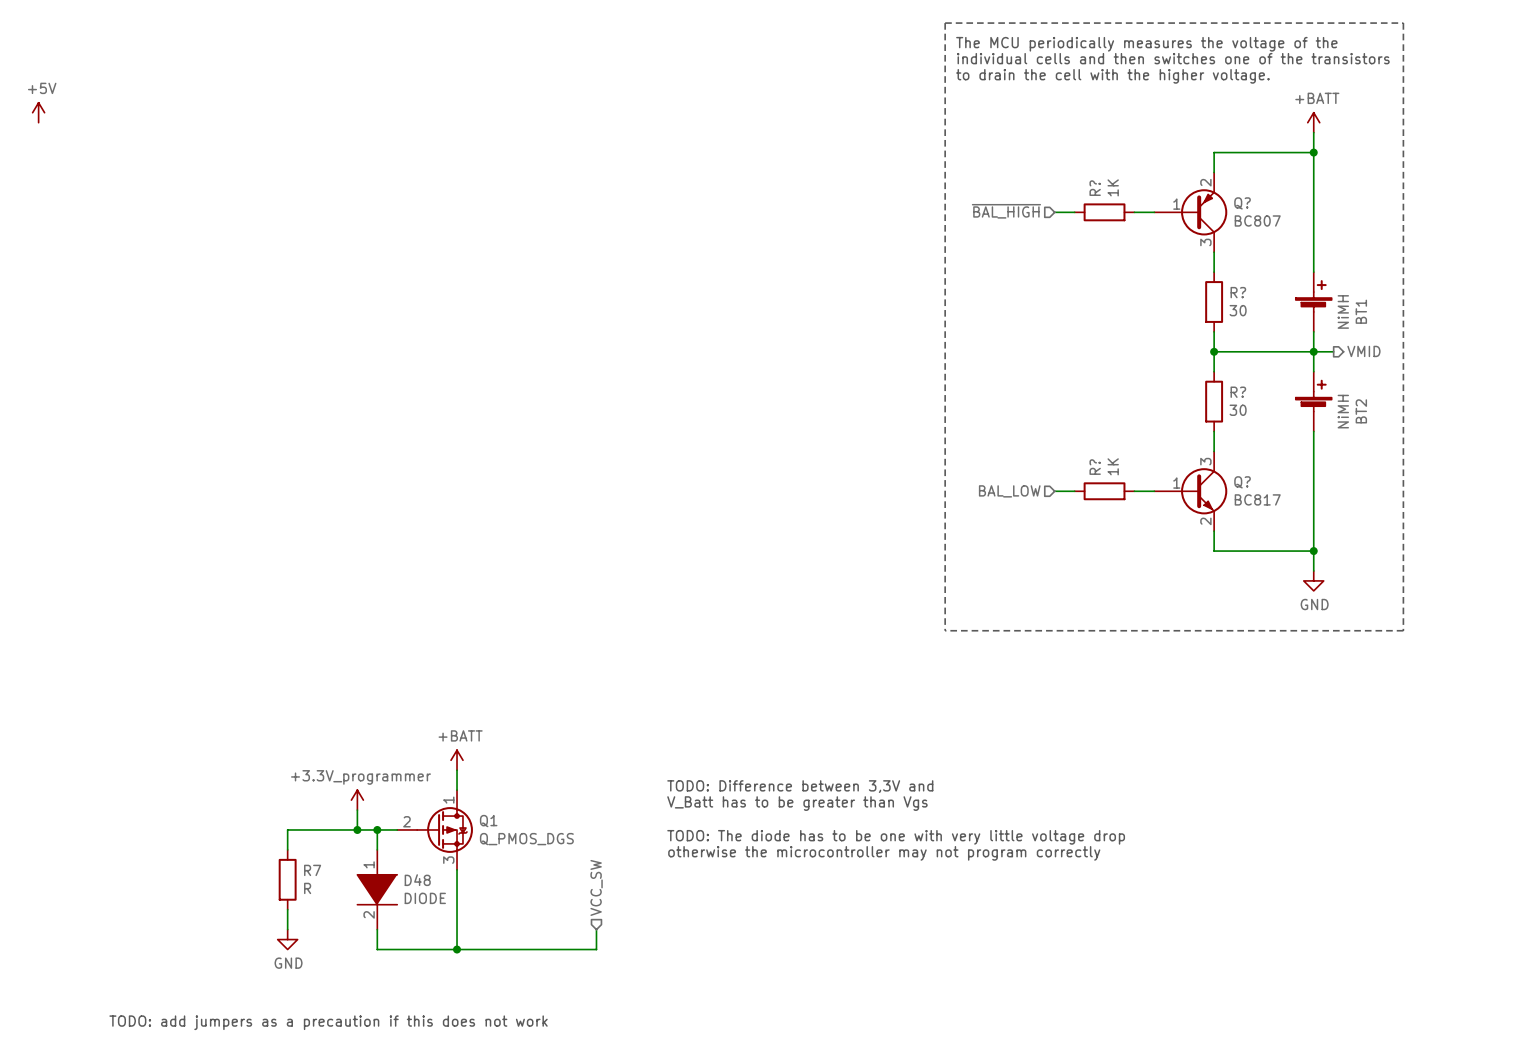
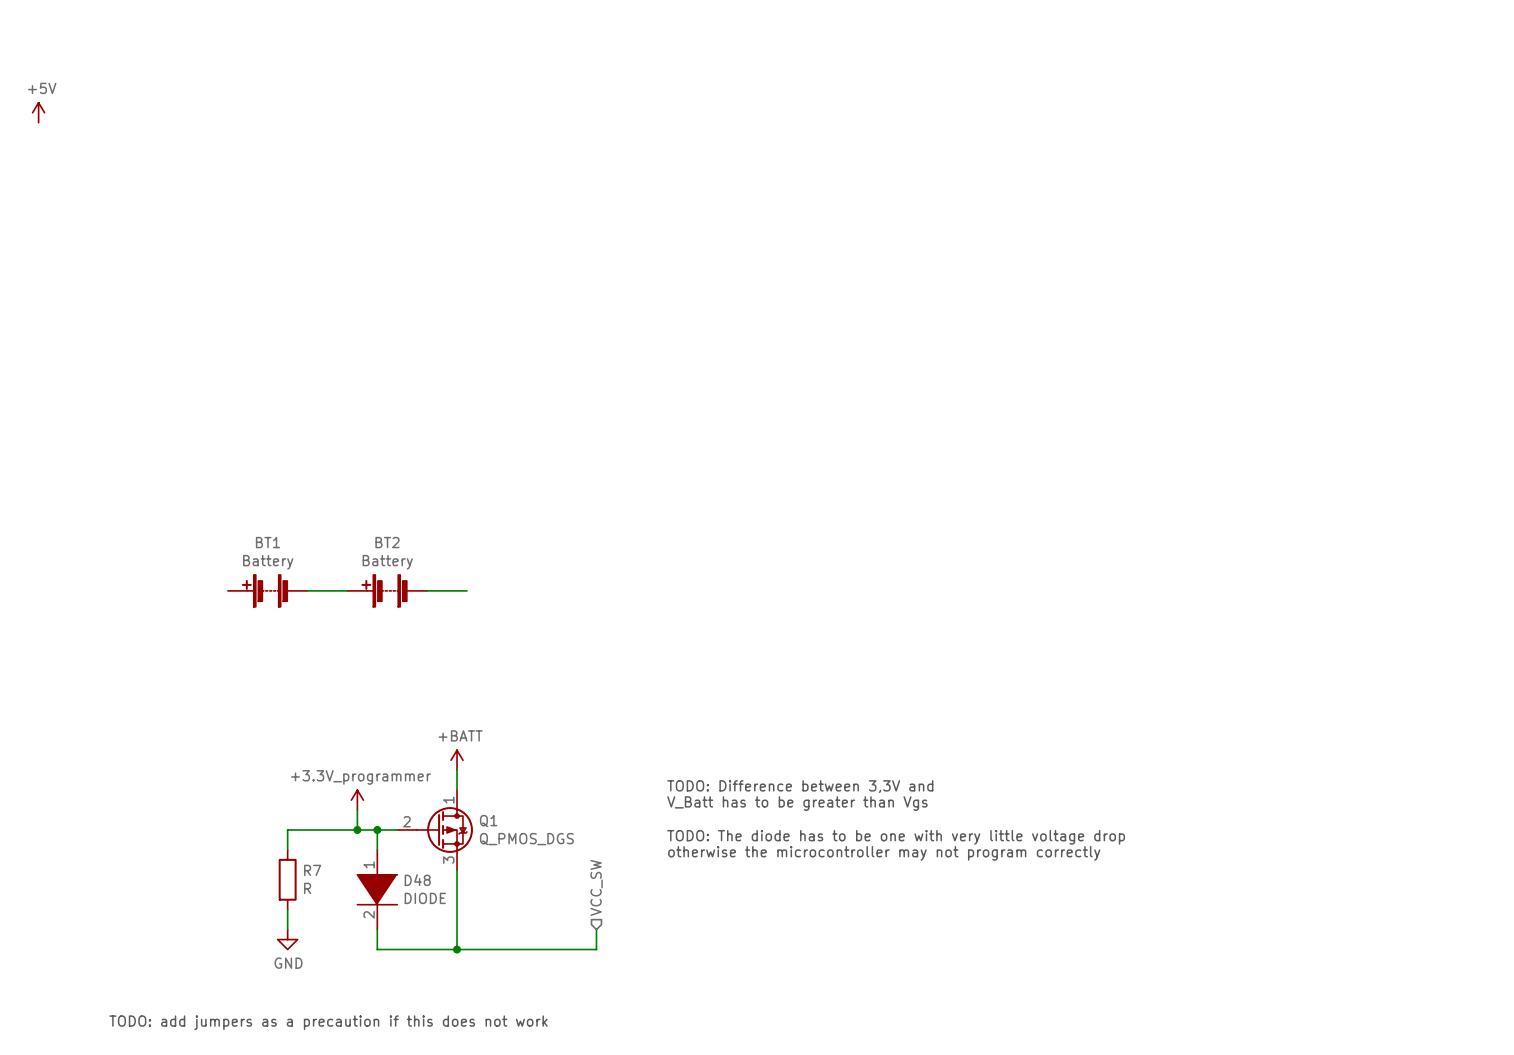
line: (945, 23) (945, 630) (1403, 630) (1403, 23) (945, 23) -> none
text: The MCU periodically measures the voltage of the (1146, 44) -> none
text: individual cells and then switches one of the transistors (1173, 58) -> none
text: to drain the cell with the higher voltage. (1112, 76) -> none
power symbol: +BATT (1313, 122) -> none
wire: (1313, 132) (1313, 272) -> none
wire: (1313, 152) (1214, 152) (1214, 172) -> none
junction: (1313, 152) -> none
hierarchical label: ~{BAL_HIGH} (1006, 211) -> none
wire: (1054, 212) (1074, 212) -> none
R?: 1K (1104, 212) -> none
wire: (1134, 212) (1154, 212) -> none
Q?: BC807 (1190, 212) -> none
wire: (1214, 252) (1214, 272) -> none
BT1 symbol: [1295, 272, 1332, 332] -> [227, 574, 308, 607]
R?: 30 (1214, 302) -> none
BT1 value: NiMH (1343, 311) -> Battery (268, 562)
BT1 name position: BT1 (1361, 311) -> BT1 (267, 542)
wire: (1214, 331) (1214, 371) -> none
wire: (1313, 331) (1313, 371) -> none
wire: (1214, 351) (1333, 351) -> none
junction: (1214, 351) -> none
junction: (1313, 351) -> none
hierarchical label: VMID (1363, 351) -> none
BT2 symbol: [1295, 371, 1332, 432] -> [347, 574, 428, 607]
R?: 30 (1214, 401) -> none
BT2 value: NiMH (1343, 411) -> Battery (387, 562)
BT2 name position: BT2 (1361, 411) -> BT2 (387, 542)
wire: (1214, 431) (1214, 451) -> none
wire: (1313, 431) (1313, 570) -> none
hierarchical label: BAL_LOW (1009, 491) -> none
wire: (1054, 491) (1074, 491) -> none
R?: 1K (1104, 491) -> none
wire: (1134, 491) (1154, 491) -> none
Q?: BC817 (1190, 491) -> none
wire: (1214, 531) (1214, 551) (1313, 551) -> none
junction: (1313, 551) -> none
power symbol: GND (1313, 580) -> none
wire: none -> (307, 590) (347, 590)
wire: none -> (427, 590) (466, 590)

